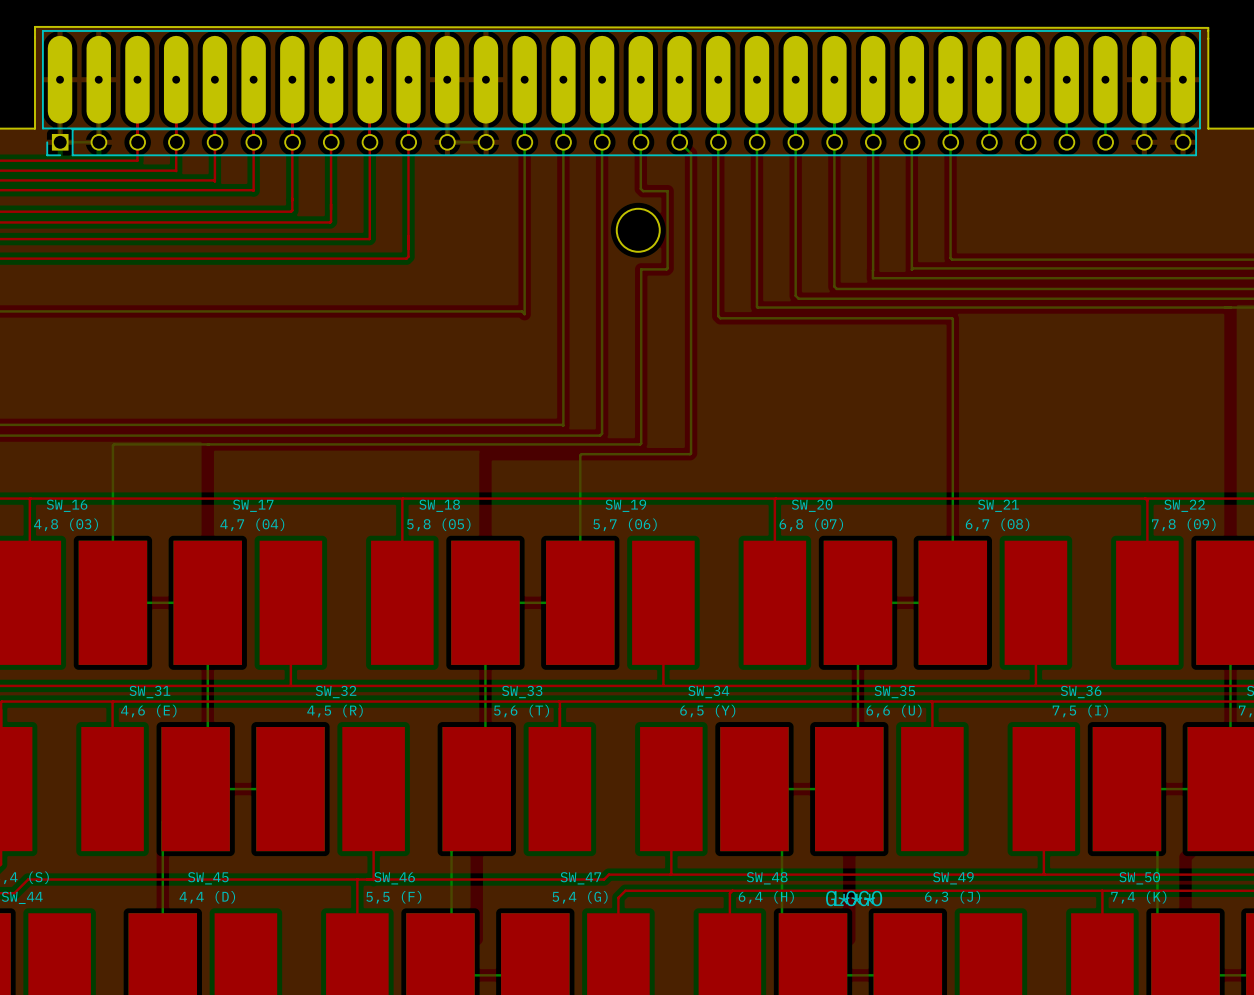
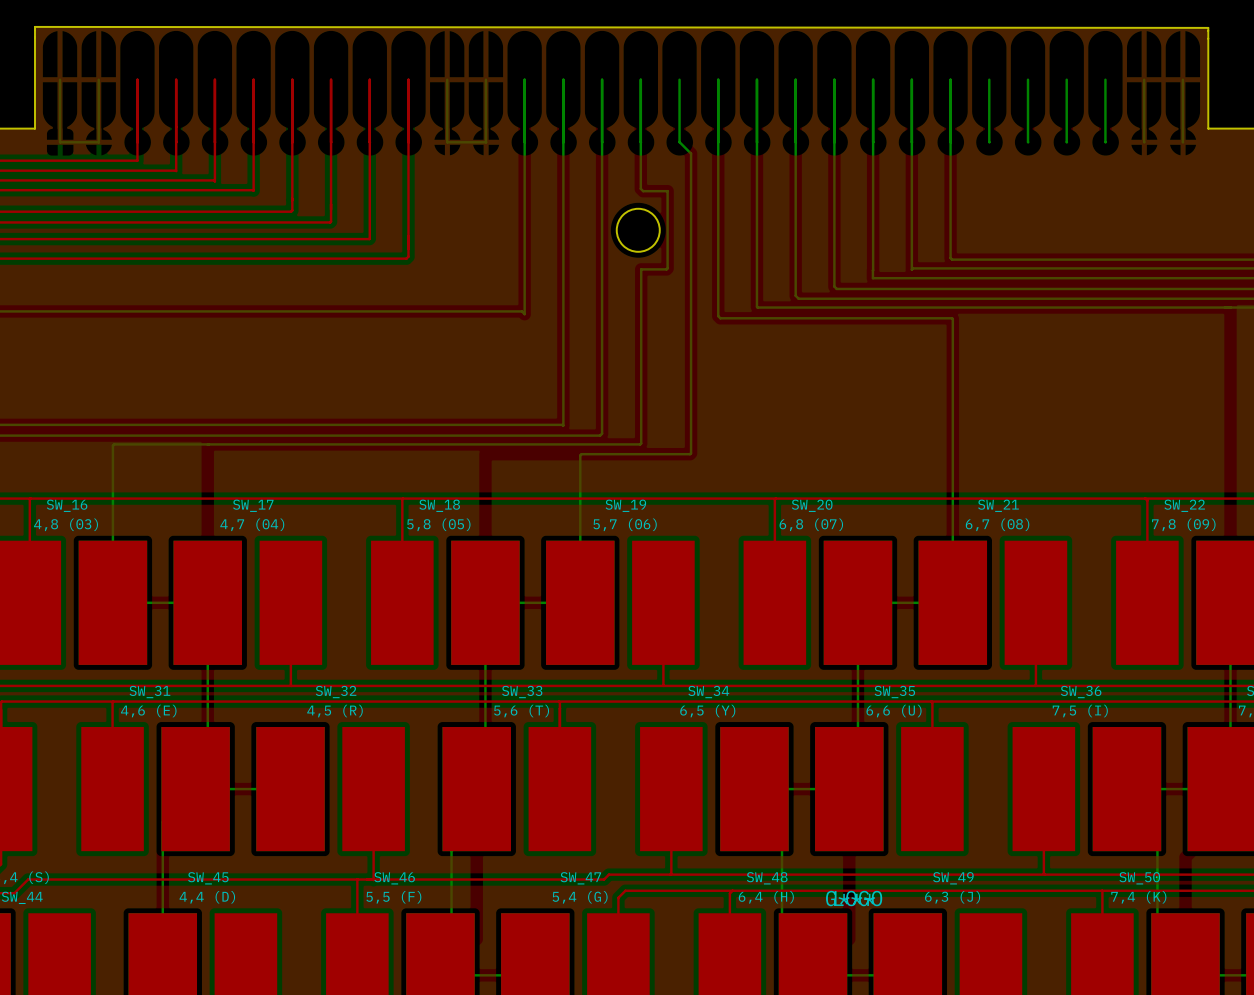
part: (621, 79) -> none
part: (621, 142) -> none

